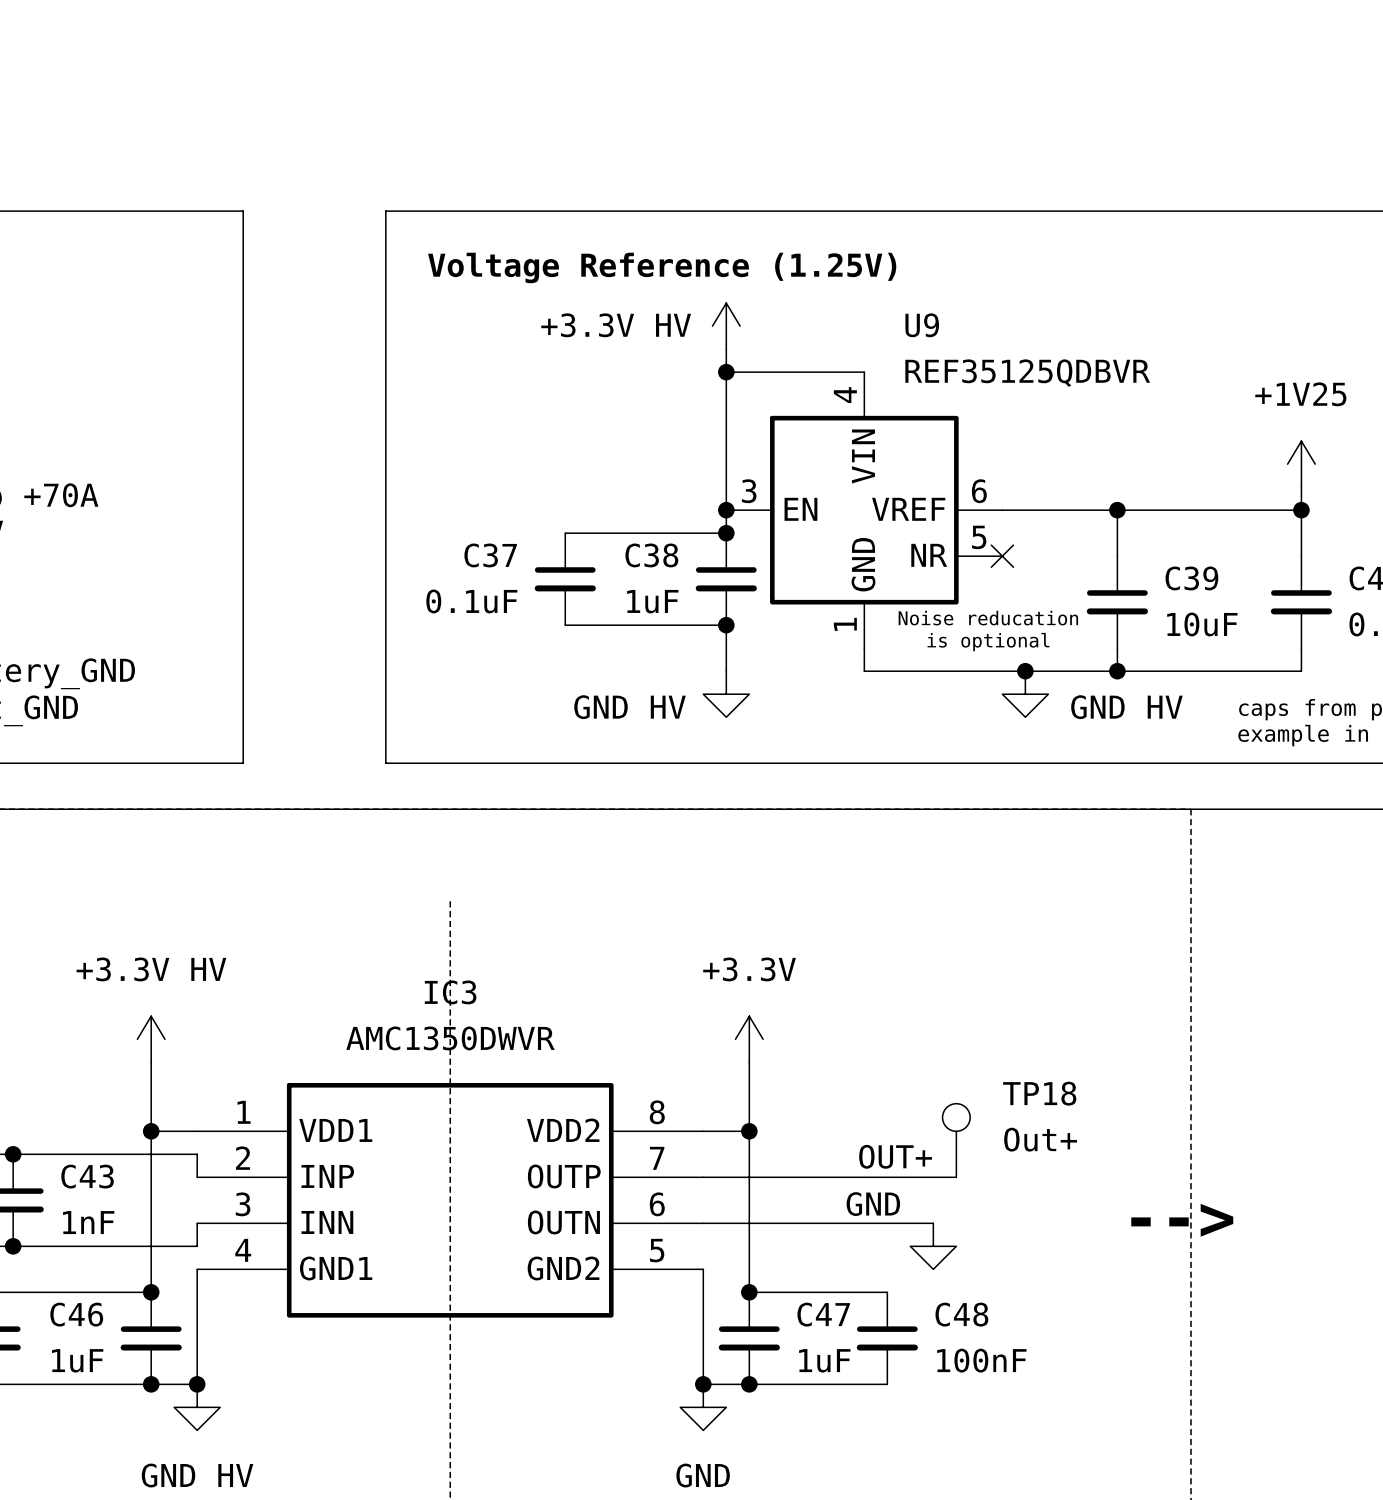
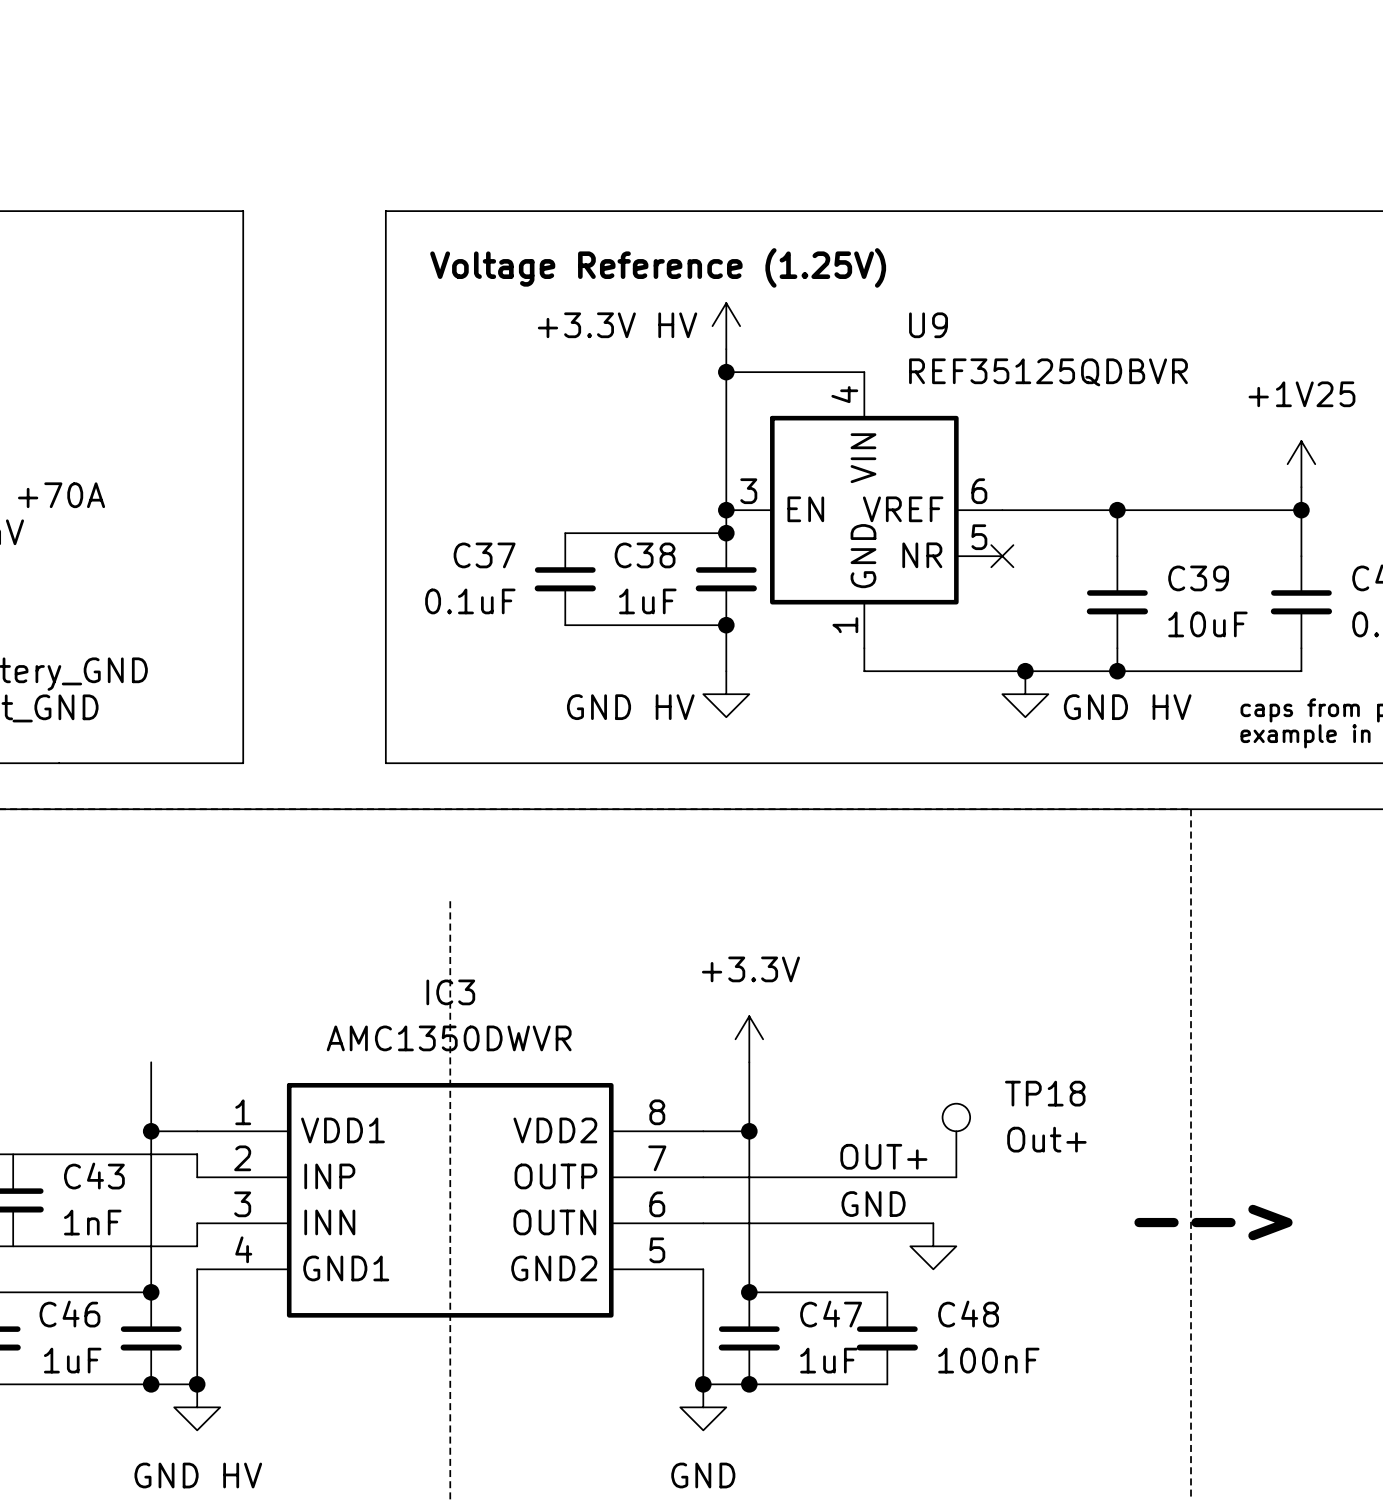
text: Noise reducation (988, 618) -> none
text: is optional (988, 642) -> none
power symbol: +3.3V HV (151, 1039) -> none
junction: (13, 1154) -> none
junction: (13, 1246) -> none

